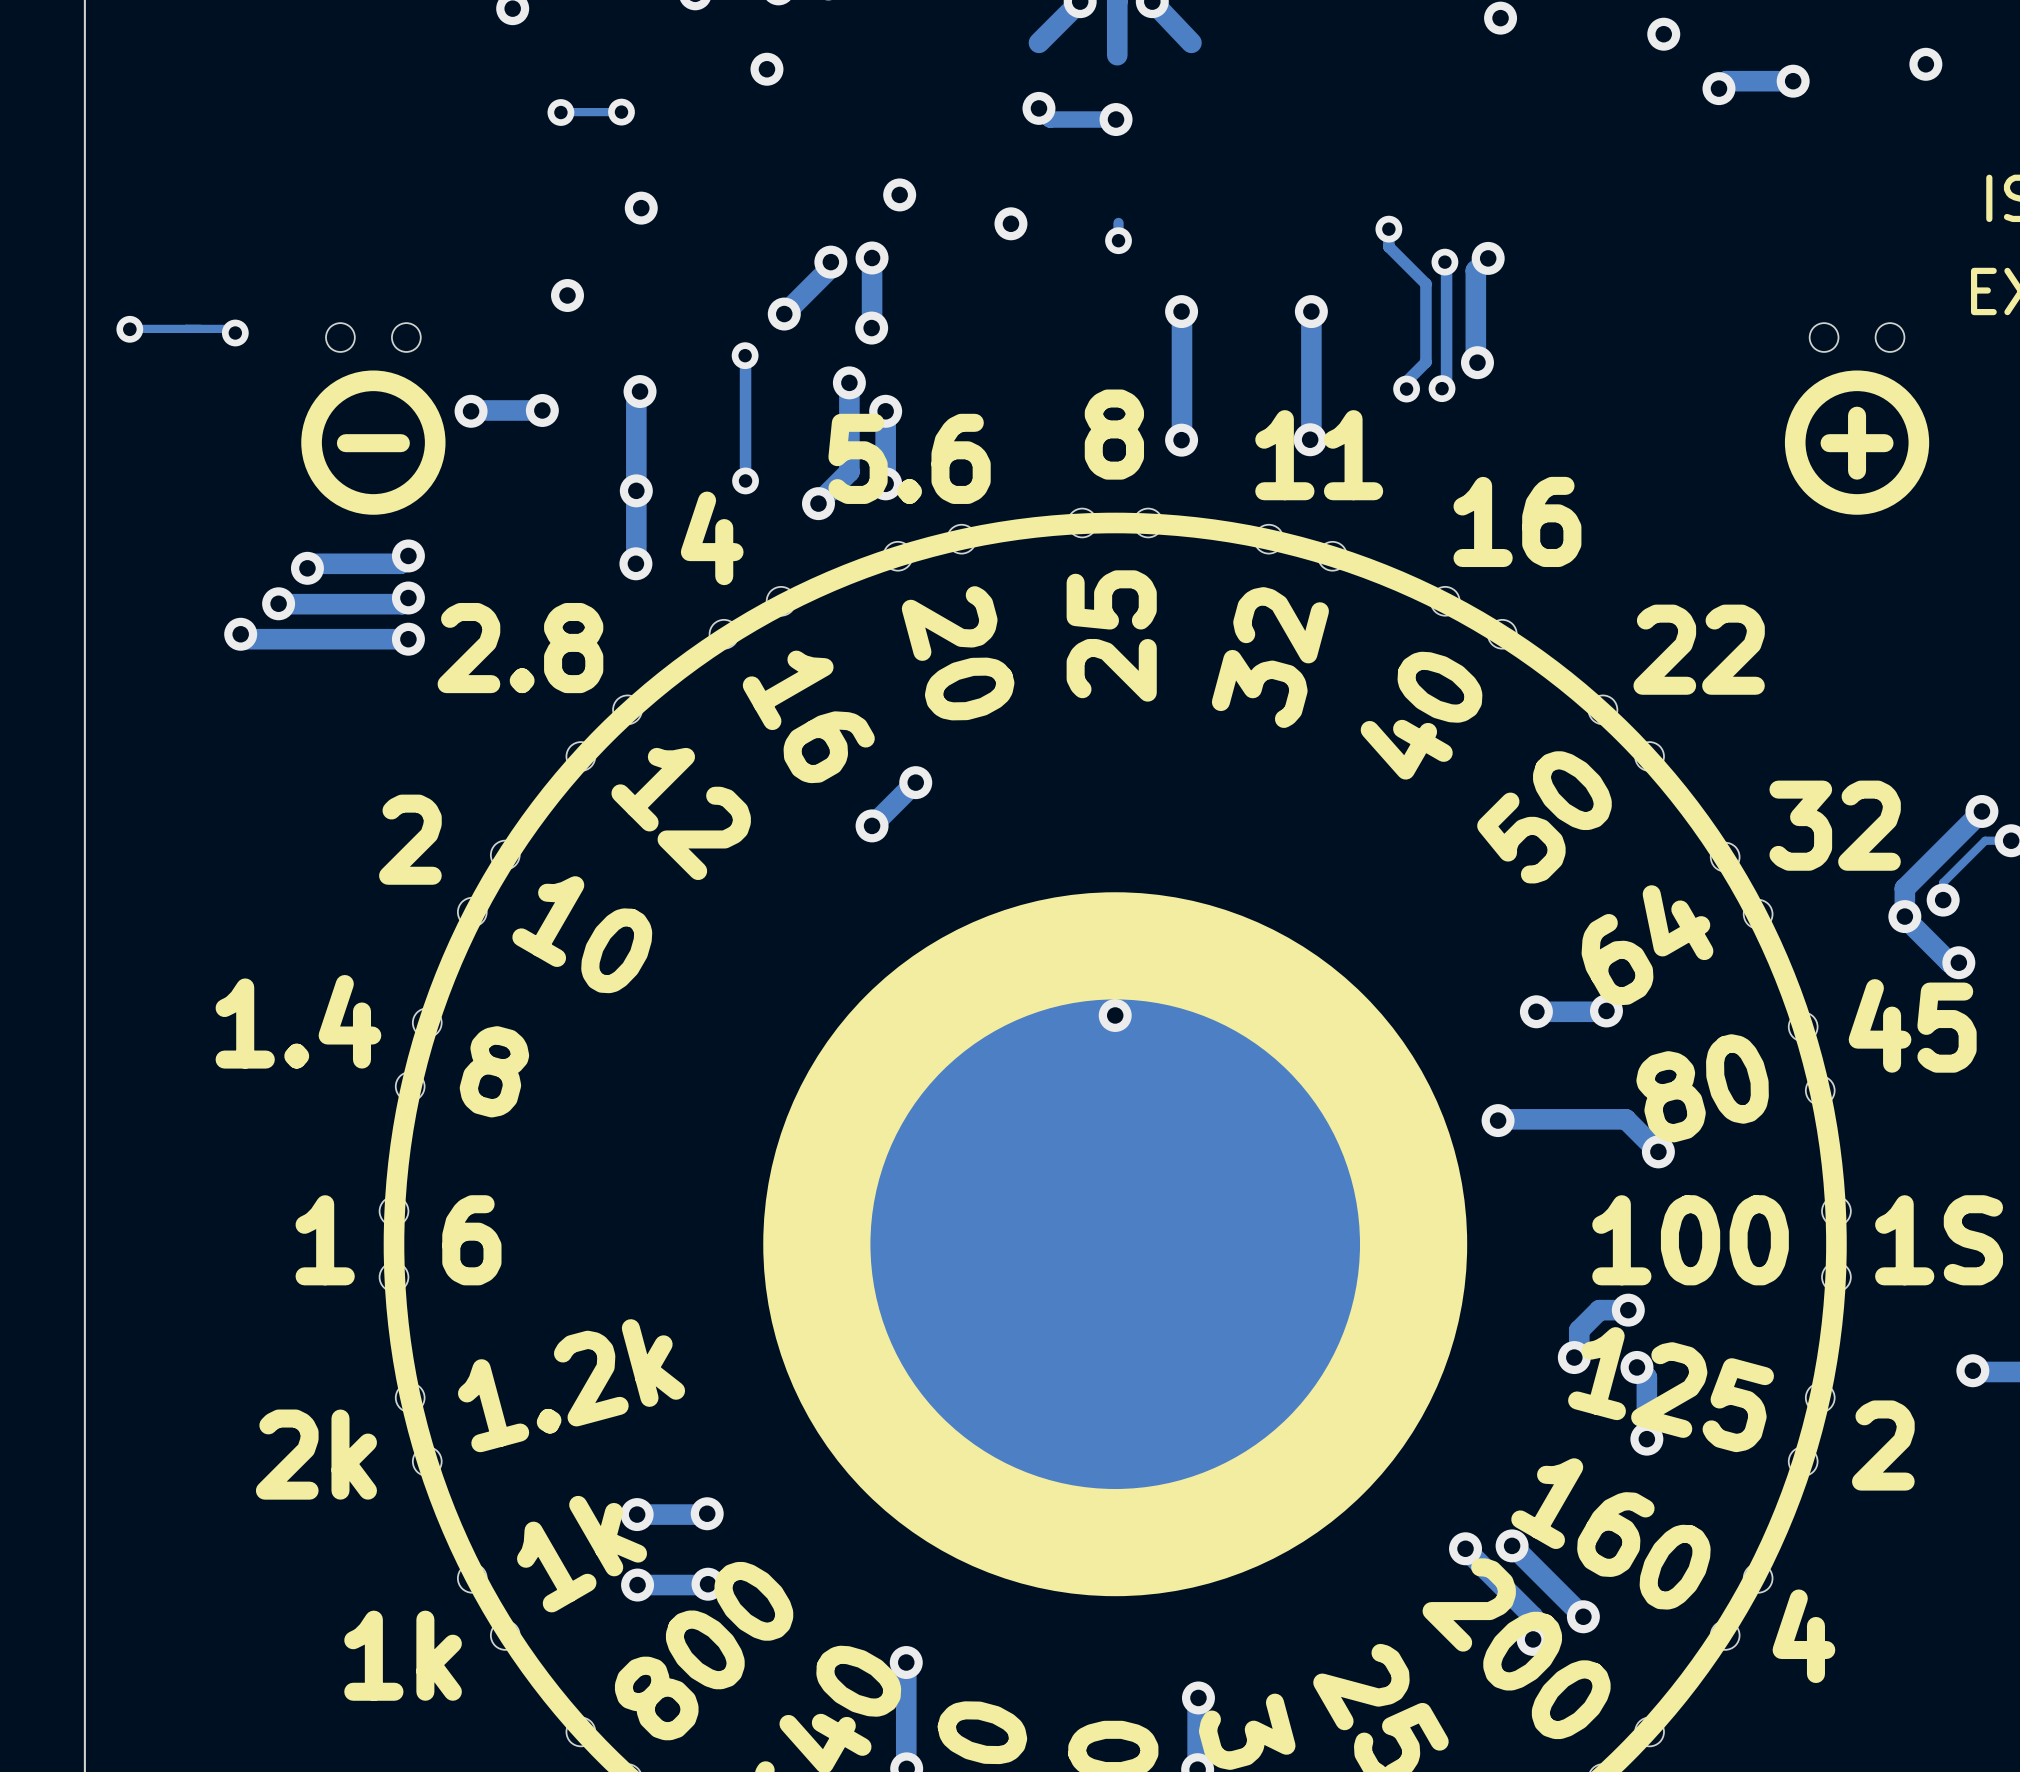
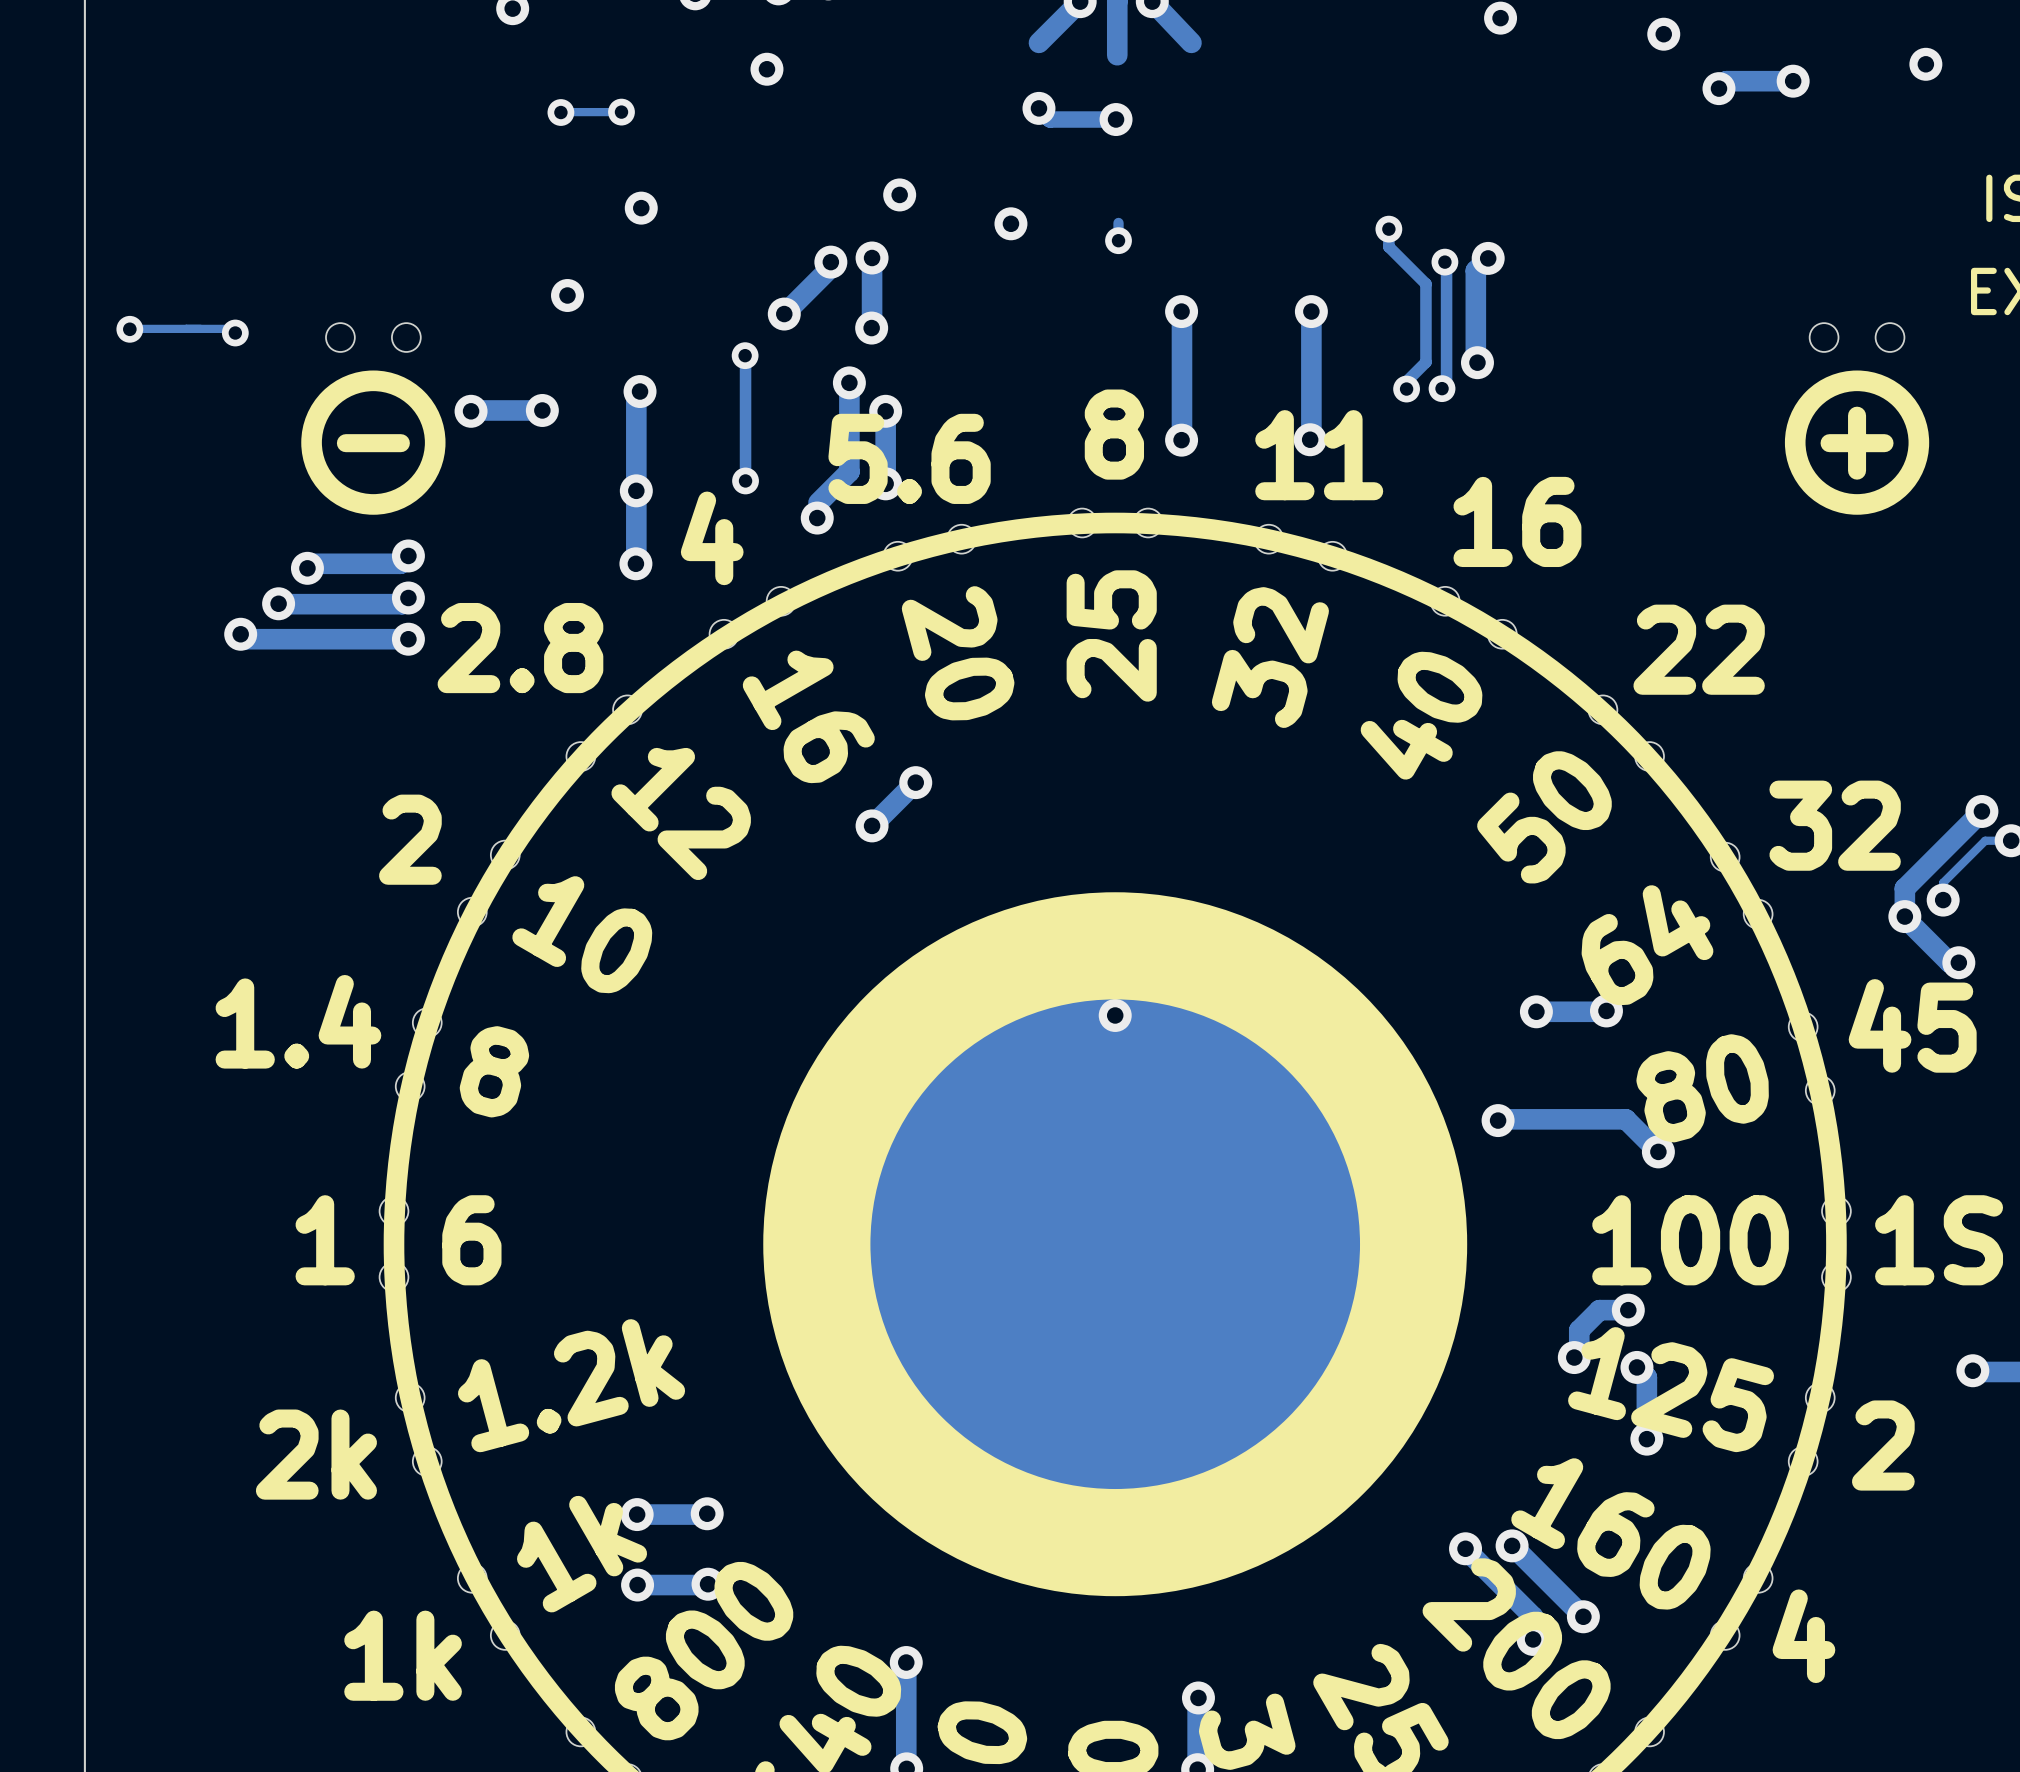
via position: (818, 503) -> (817, 518)

